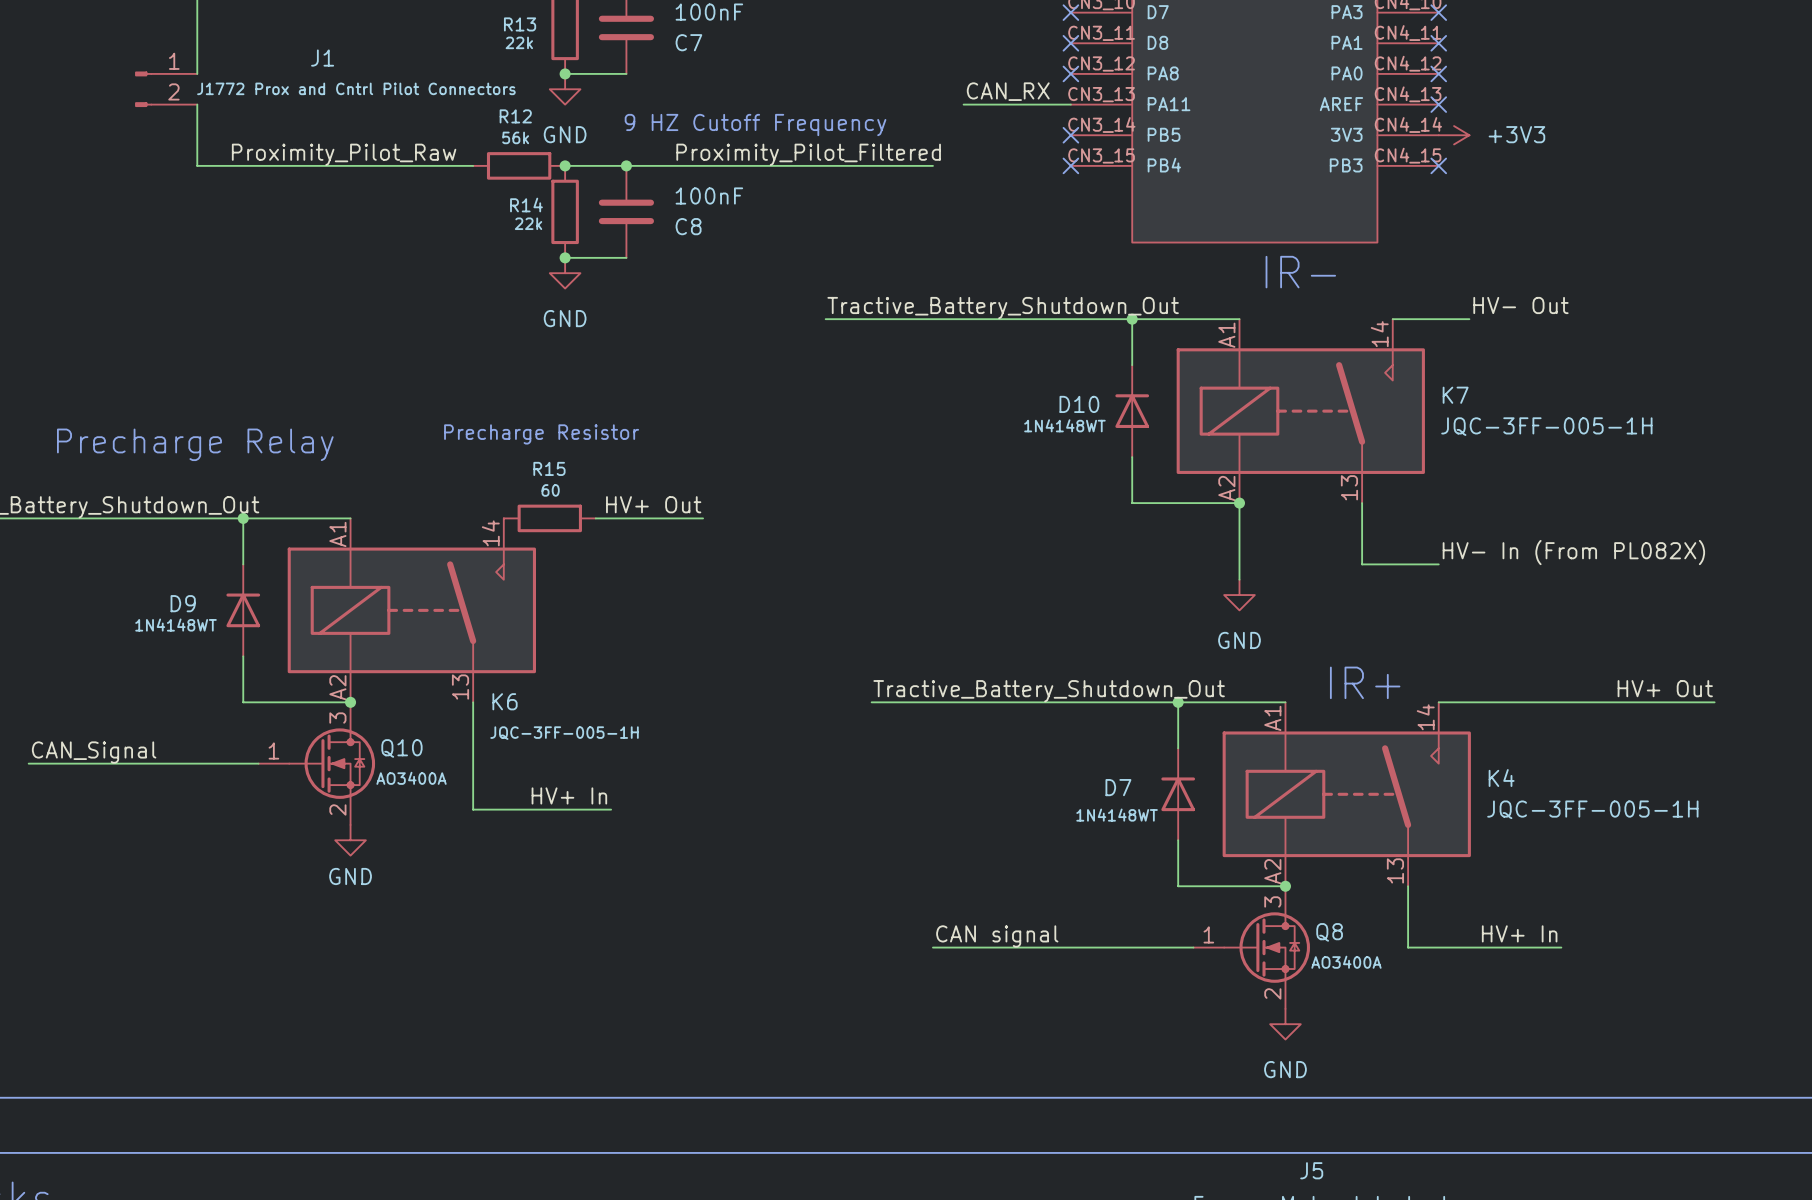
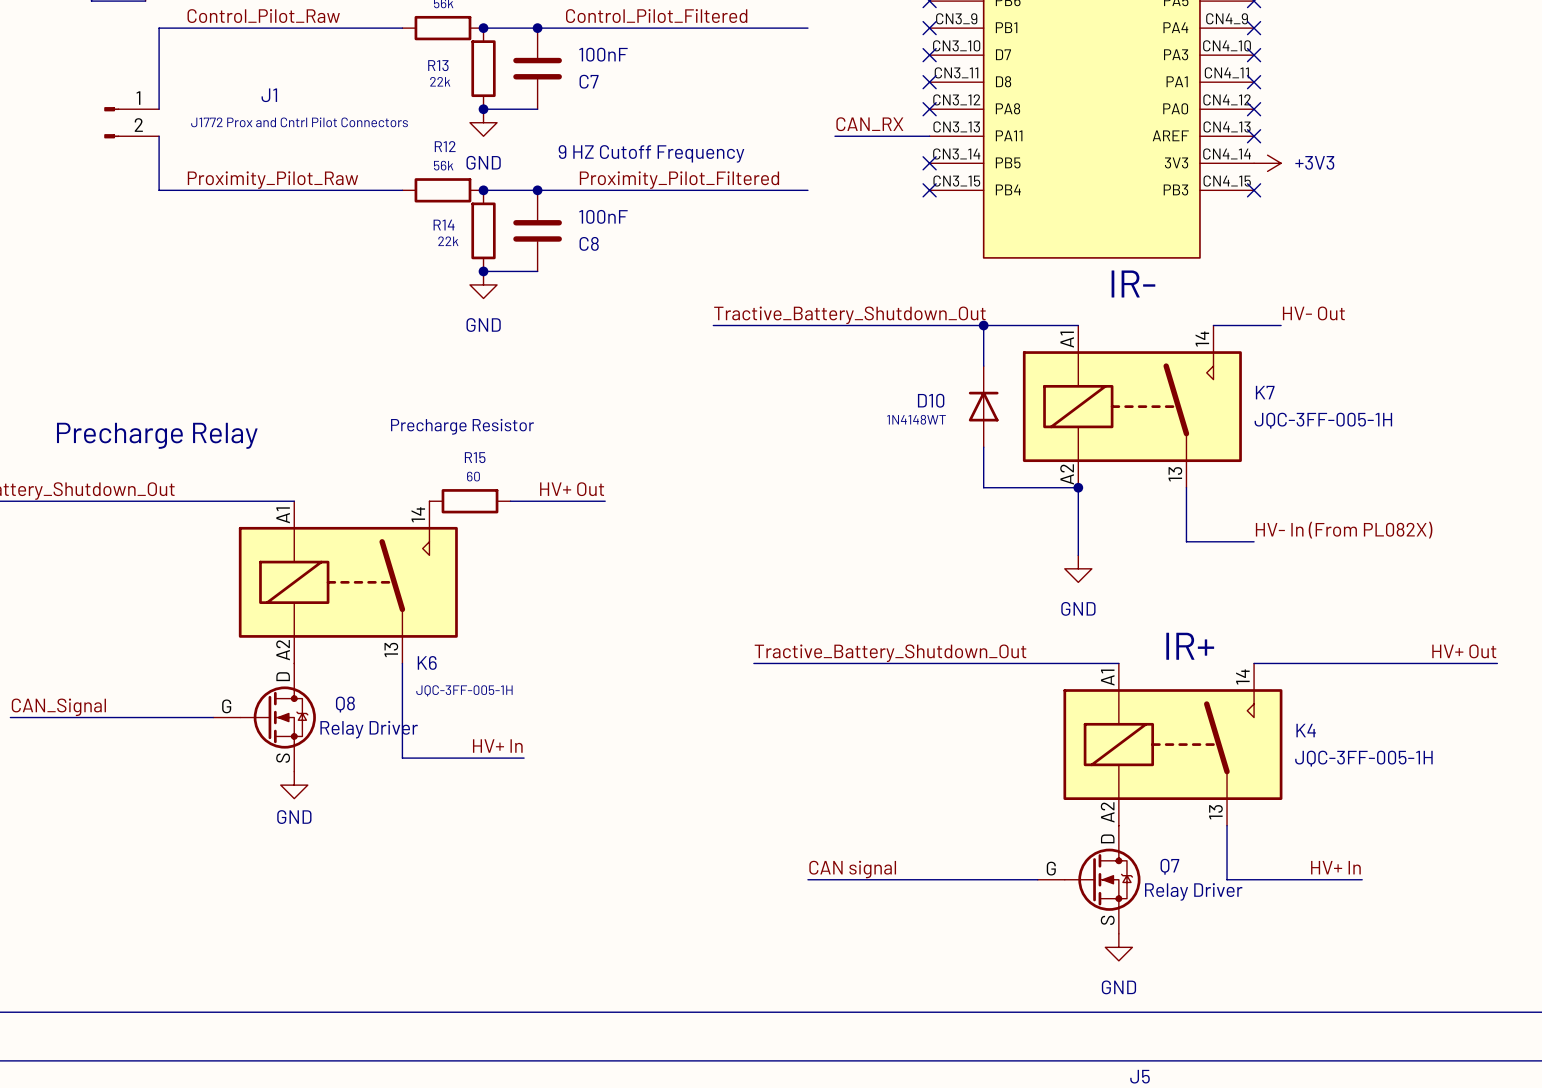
wire: (243, 518) (243, 564) -> none
junction: (243, 518) -> none
D9: 1N4148WT (243, 610) -> none
wire: (243, 656) (243, 702) (350, 702) -> none
junction: (350, 702) -> none
wire: (1178, 702) (1178, 748) -> none
junction: (1178, 702) -> none
Q10: AO3400A (316, 763) -> none
D7: 1N4148WT (1178, 794) -> none
wire: (1178, 840) (1178, 886) (1285, 886) -> none
Q8 symbol: [1193, 886, 1310, 1009] -> [213, 663, 316, 772]
junction: (1285, 886) -> none
Q7: none -> Relay Driver (1089, 879)
Q8 value: AO3400A (1346, 962) -> Relay Driver (369, 729)

